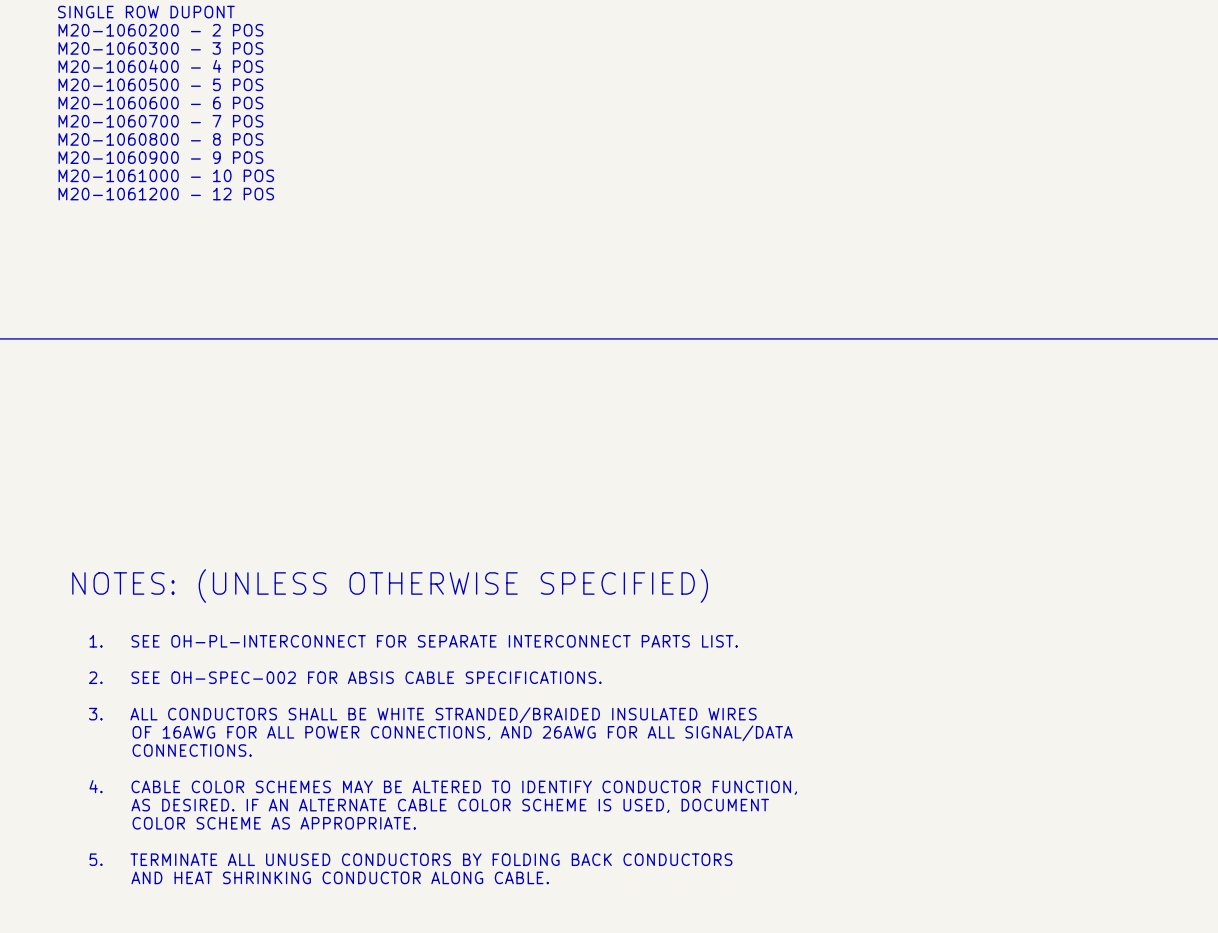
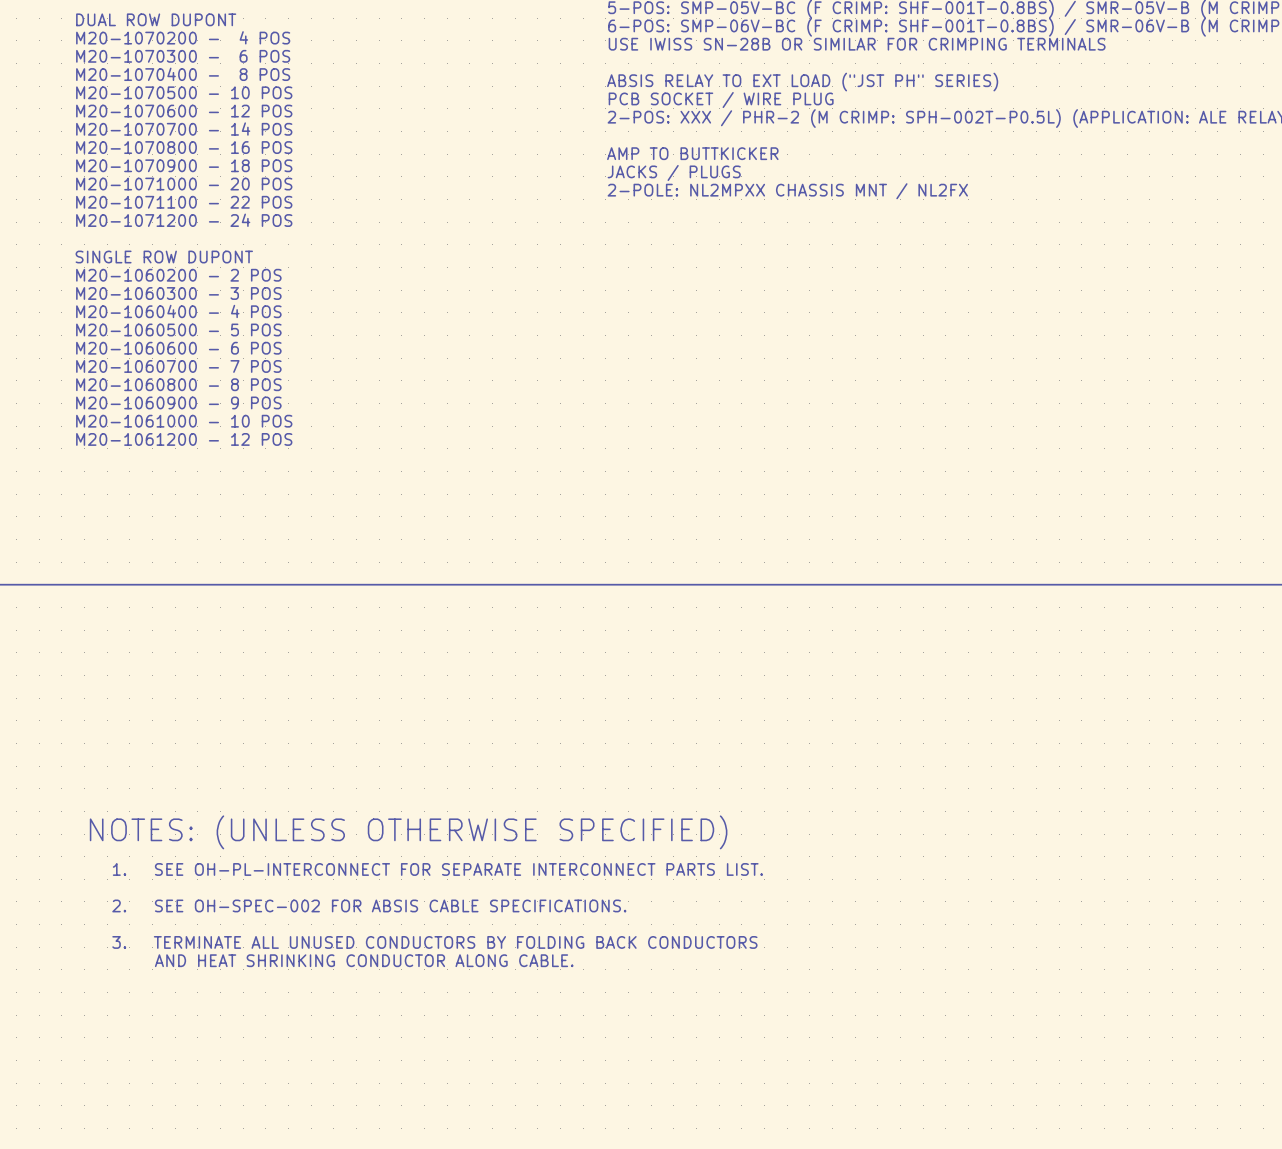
text position: 1. SEE OH-PL-INTERCONNECT FOR SEPARATE INTERCONNECT PARTS LIST. (413, 641) -> 1. SEE OH-PL-INTERCONNECT FOR SEPARATE INTERCONNECT PARTS LIST. (437, 869)
text position: 2. SEE OH-SPEC-002 FOR ABSIS CABLE SPECIFICATIONS. (345, 677) -> 2. SEE OH-SPEC-002 FOR ABSIS CABLE SPECIFICATIONS. (369, 905)
text: none -> 3. TERMINATE ALL UNUSED CONDUCTORS BY FOLDING BACK CONDUCTORS (434, 942)
text: 3. ALL CONDUCTORS SHALL BE WHITE STRANDED/BRAIDED INSULATED WIRES (422, 715) -> none
text: OF 16AWG FOR ALL POWER CONNECTIONS, AND 26AWG FOR ALL SIGNAL/DATA (462, 733) -> none
text: CONNECTIONS. (192, 750) -> none
text: 4. CABLE COLOR SCHEMES MAY BE ALTERED TO IDENTIFY CONDUCTOR FUNCTION, (443, 787) -> none
text: AS DESIRED. IF AN ALTERNATE CABLE COLOR SCHEME IS USED, DOCUMENT (450, 805) -> none
text: COLOR SCHEME AS APPROPRIATE. (274, 823) -> none
text: 5. TERMINATE ALL UNUSED CONDUCTORS BY FOLDING BACK CONDUCTORS (410, 859) -> none
text position: AND HEAT SHRINKING CONDUCTOR ALONG CABLE. (340, 877) -> AND HEAT SHRINKING CONDUCTOR ALONG CABLE. (364, 960)

